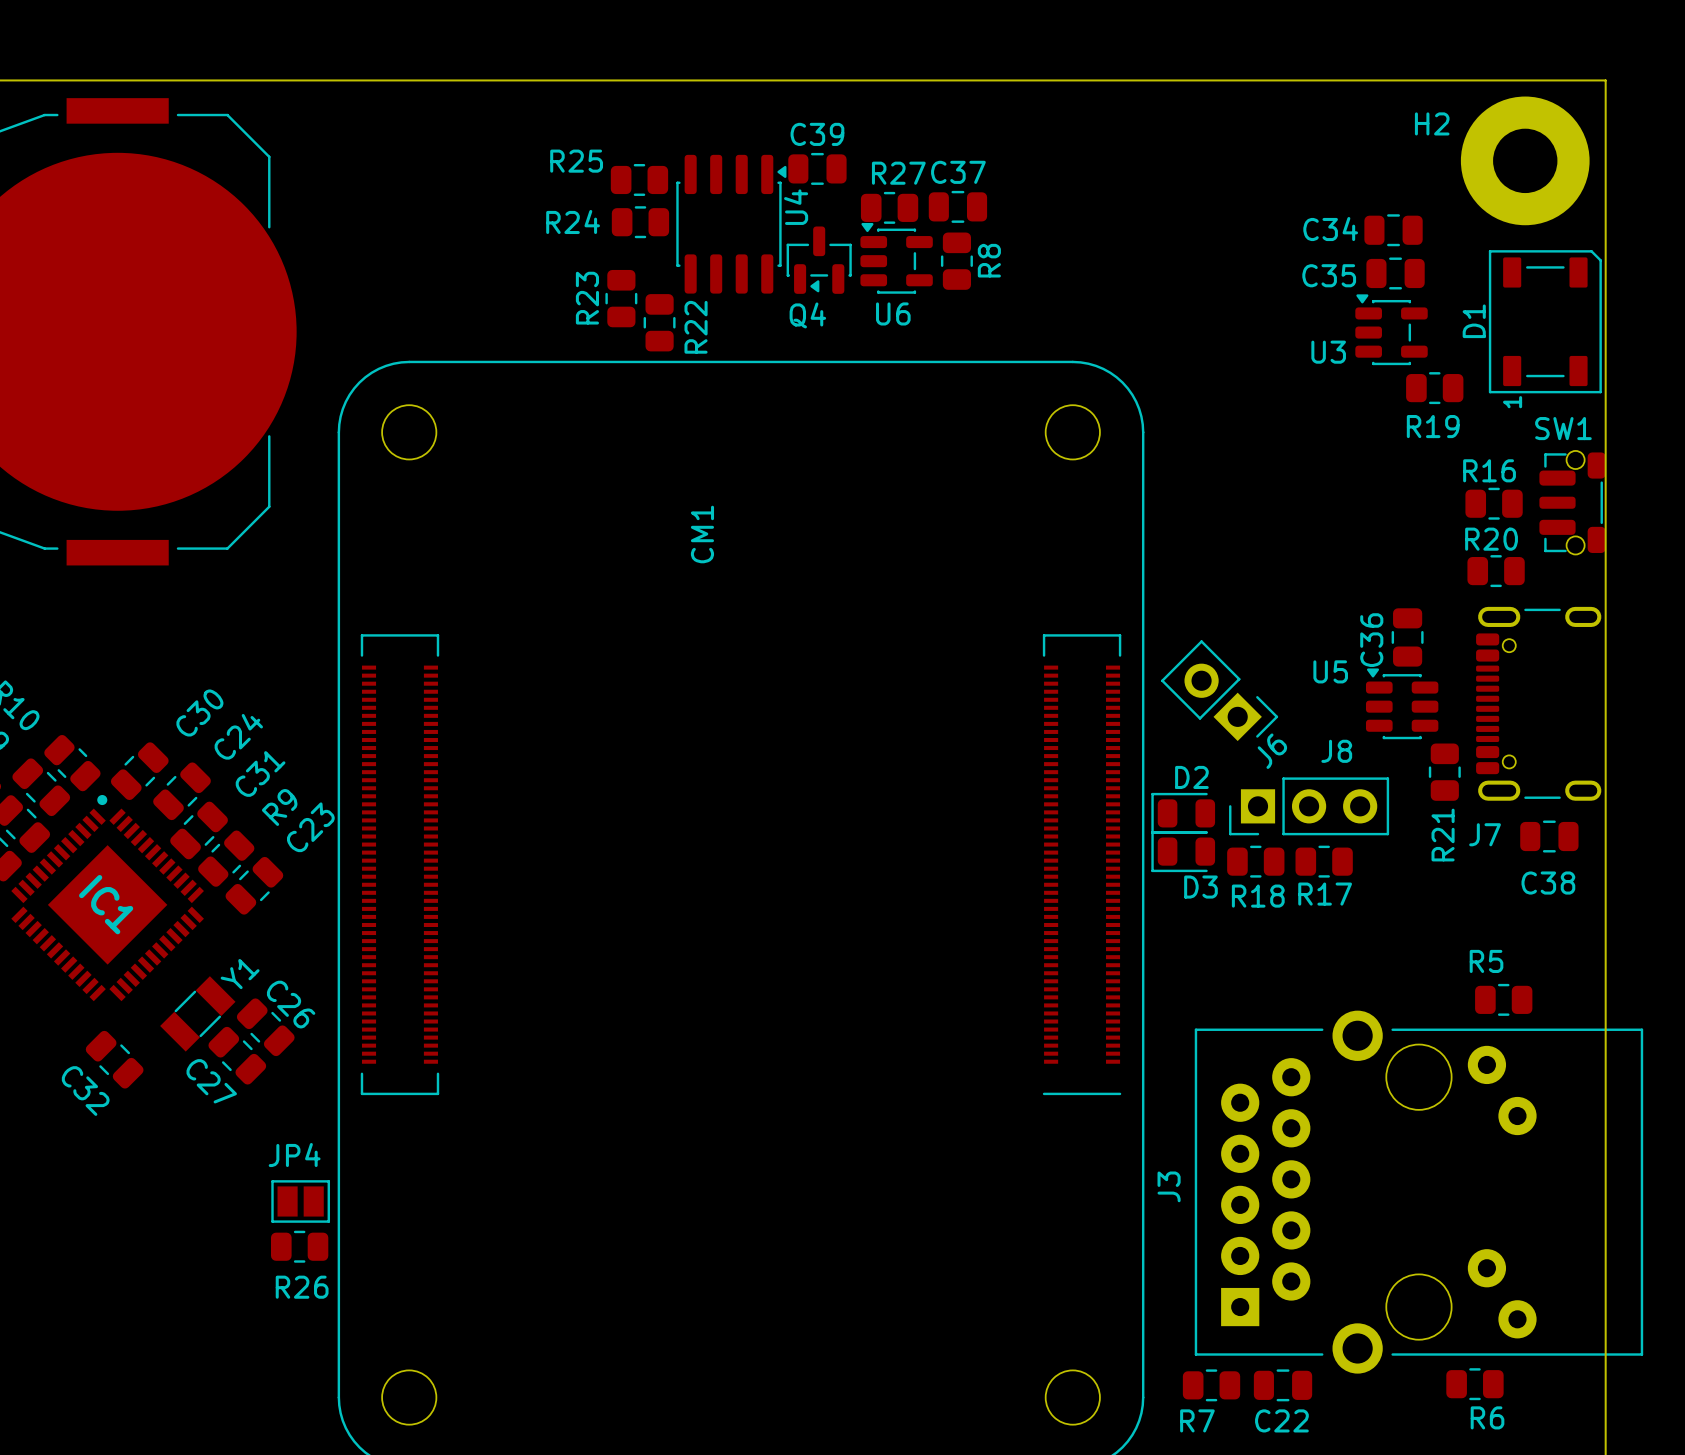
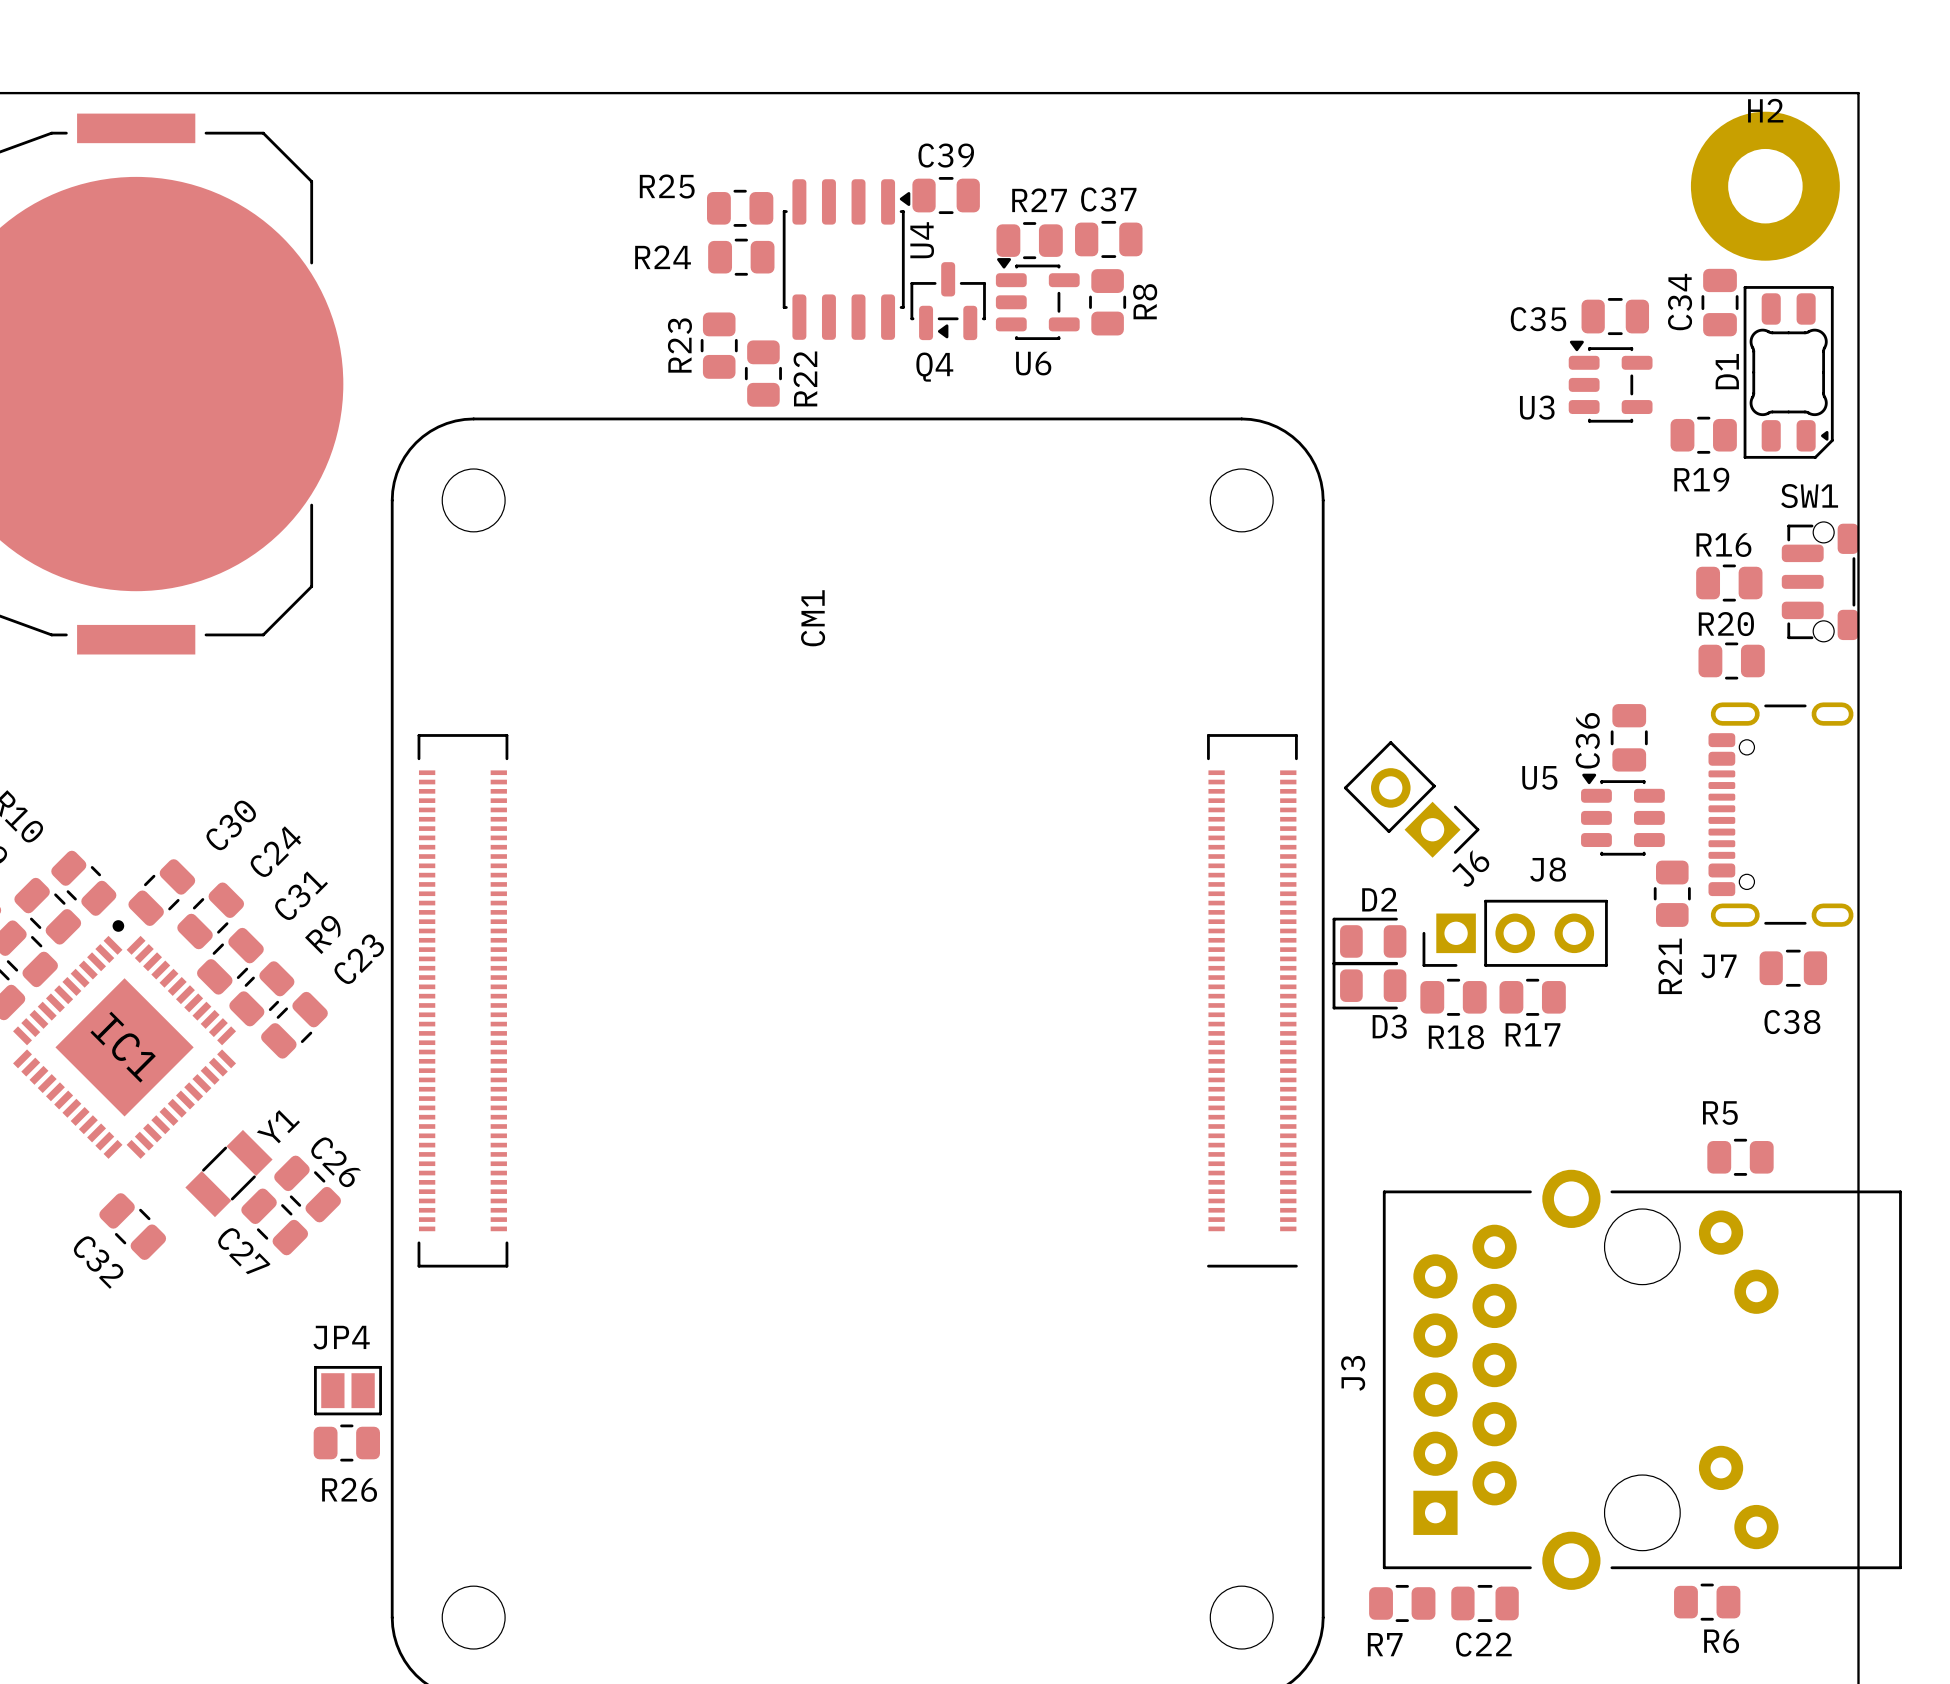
H2 name position: H2 (1432, 123) -> H2 (1765, 110)
C34 rotation: 0° (1393, 230) -> 90° clockwise (1720, 302)
C34 position: (1393, 230) -> (1720, 302)
D1 footprint: [1488, 250, 1602, 394] -> [1743, 286, 1834, 459]
R19 position: (1434, 388) -> (1703, 435)

